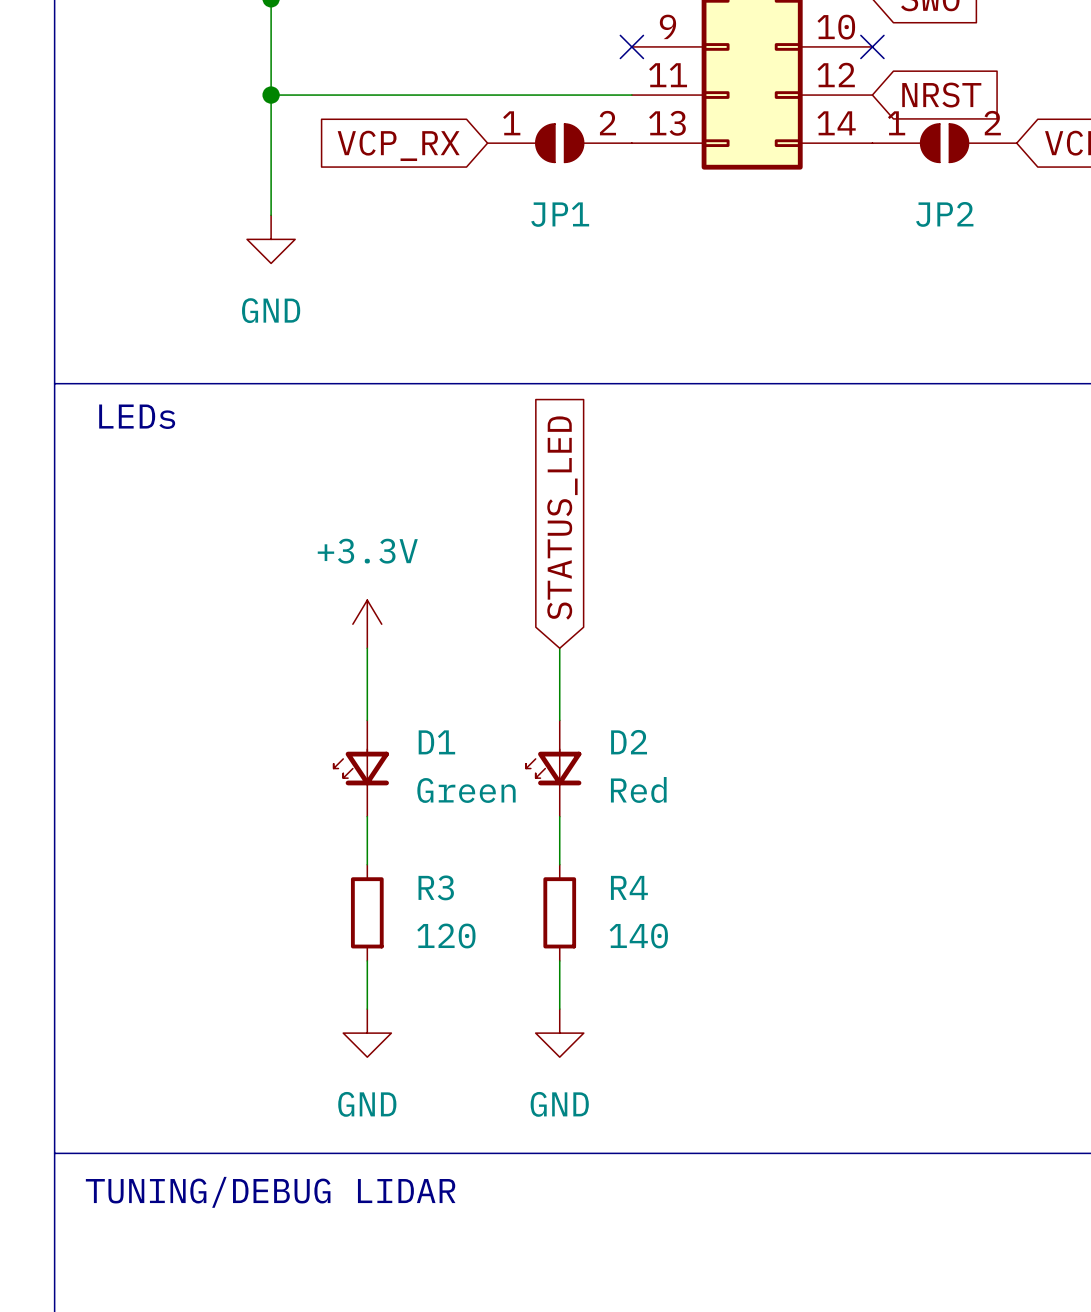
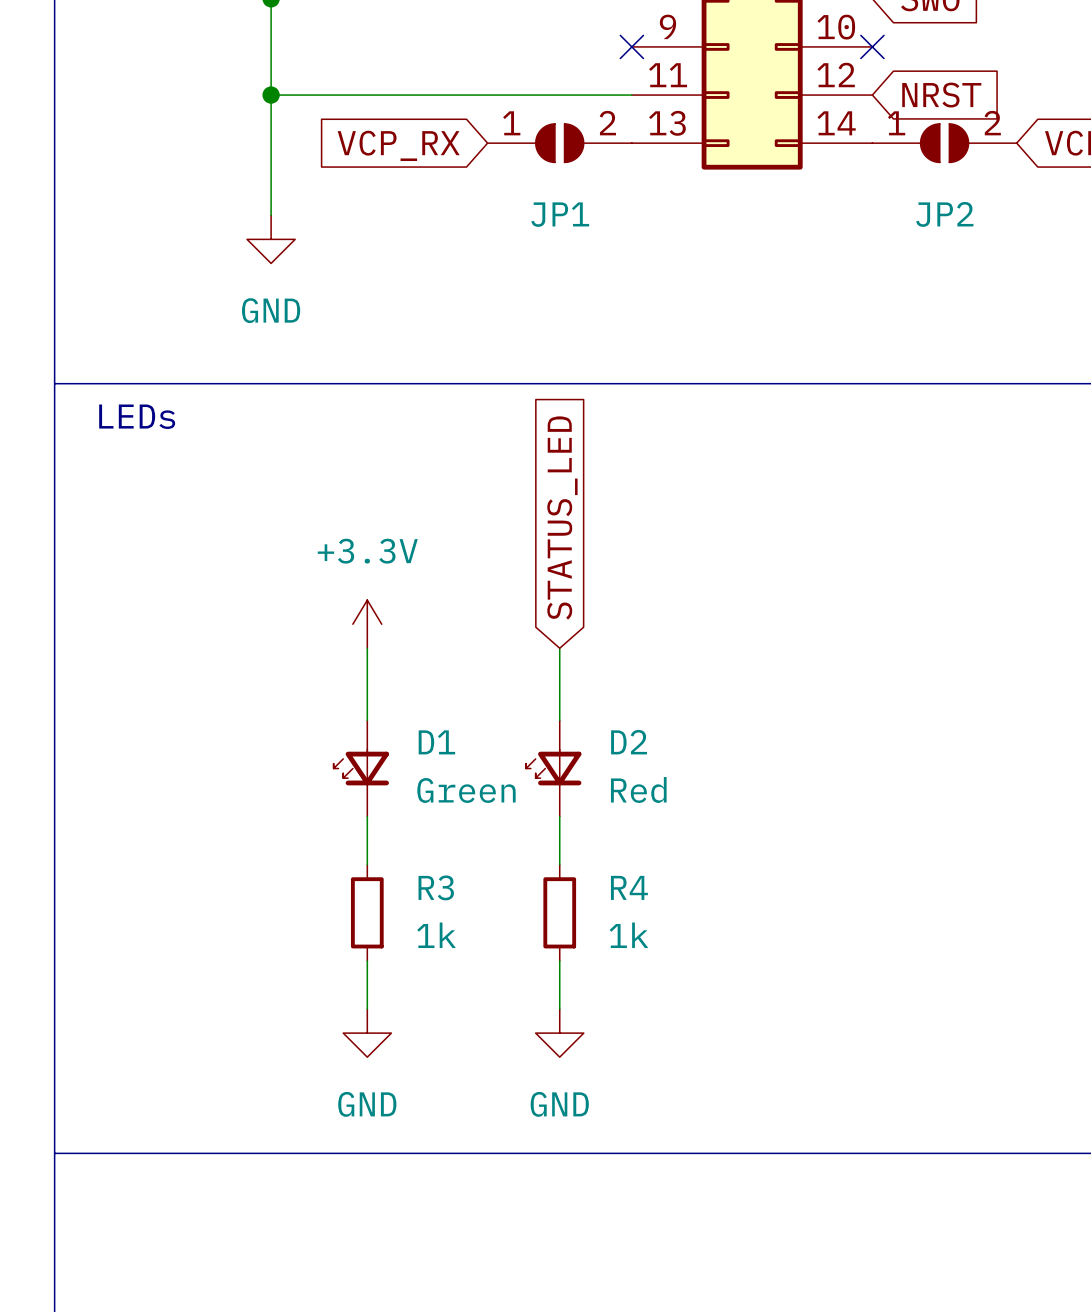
R3 value: 120 (446, 936) -> 1k (436, 935)
R4 value: 140 (638, 936) -> 1k (628, 935)
text: TUNING/DEBUG LIDAR (270, 1192) -> none

